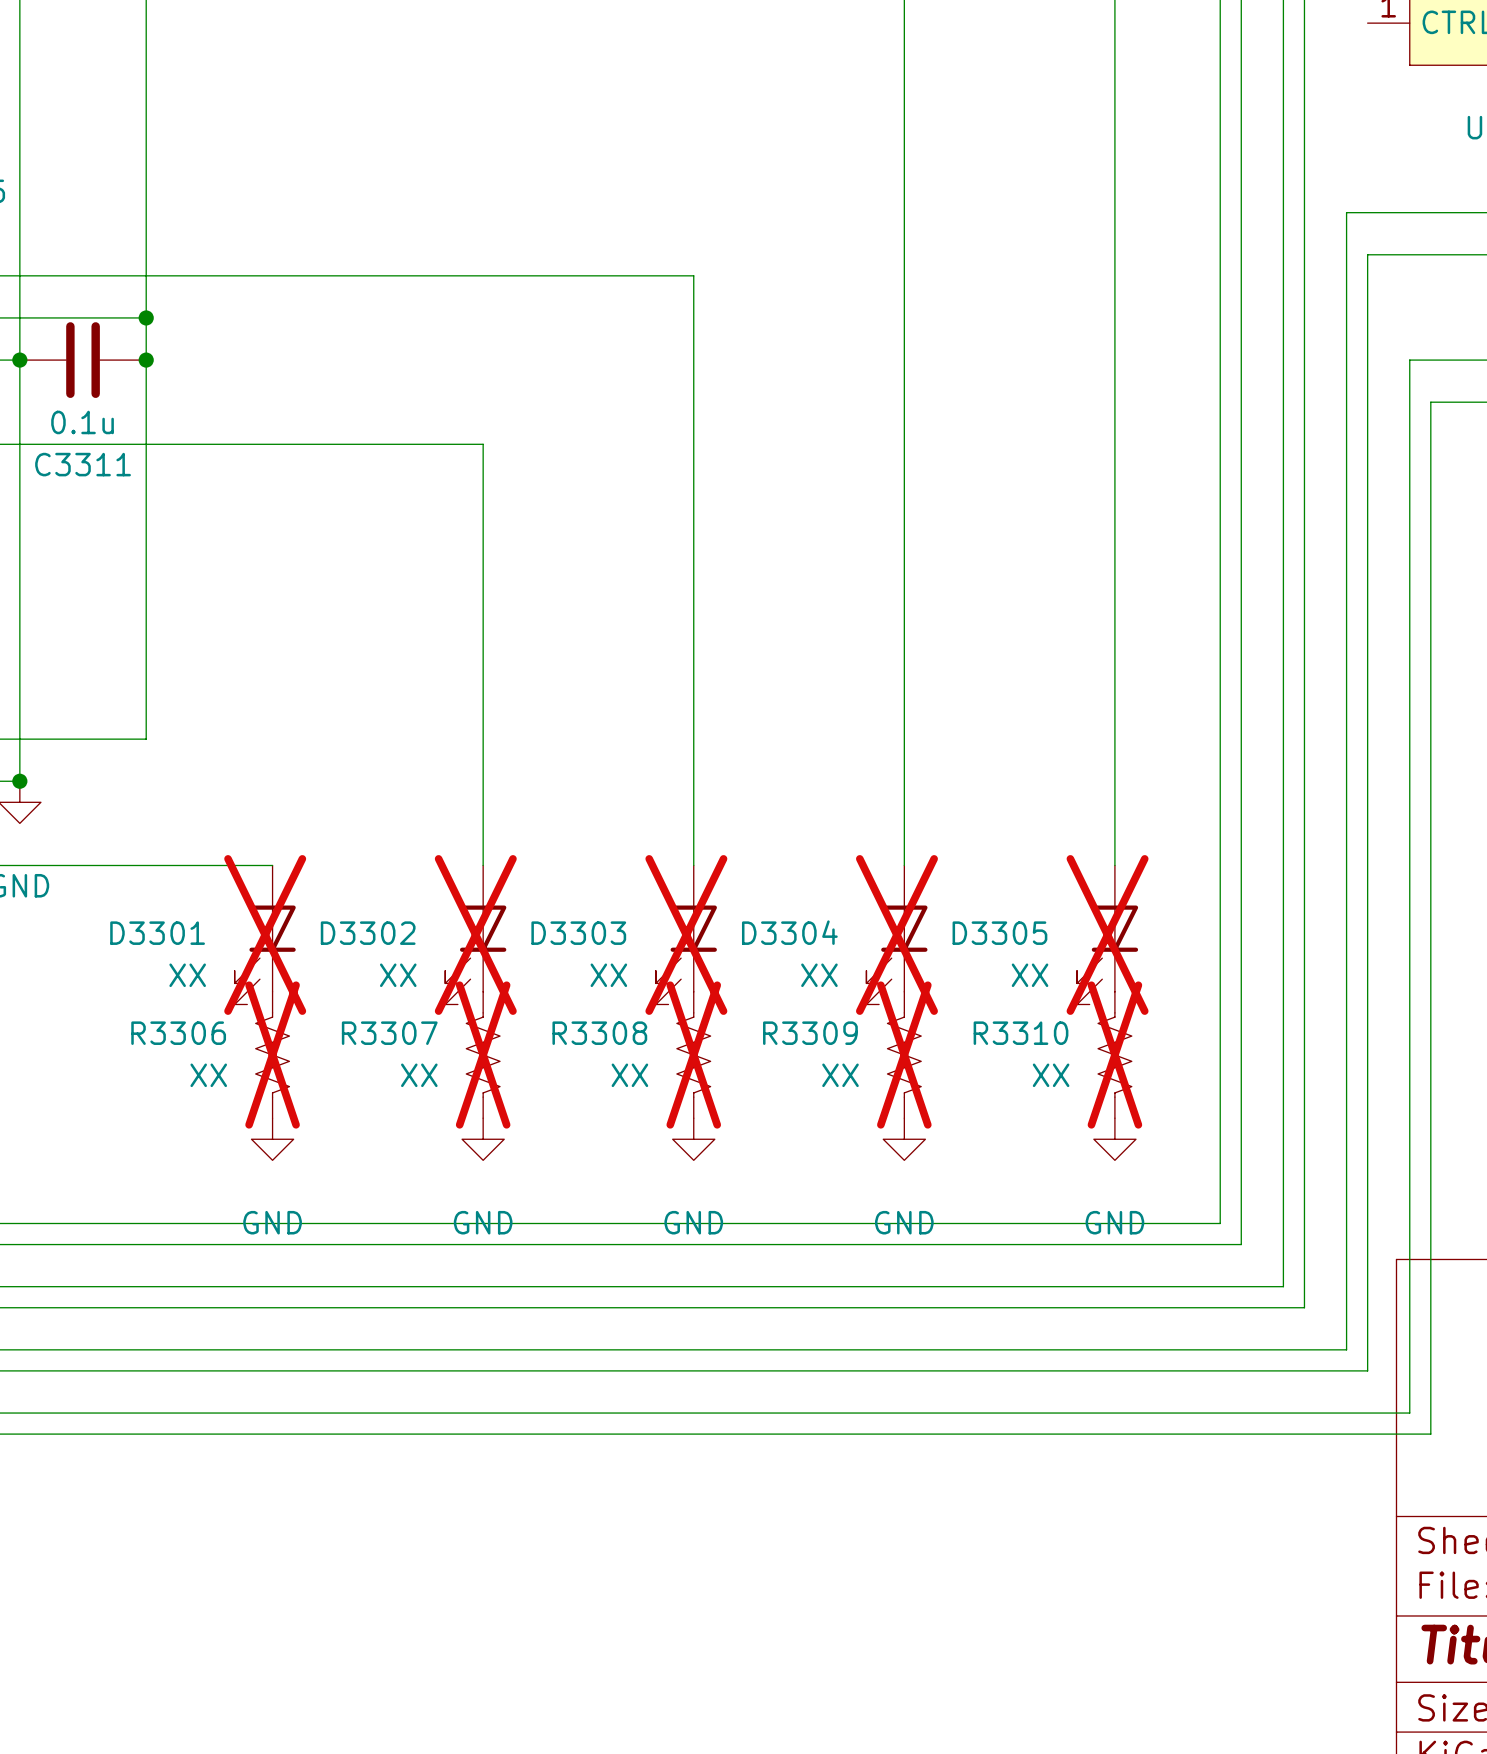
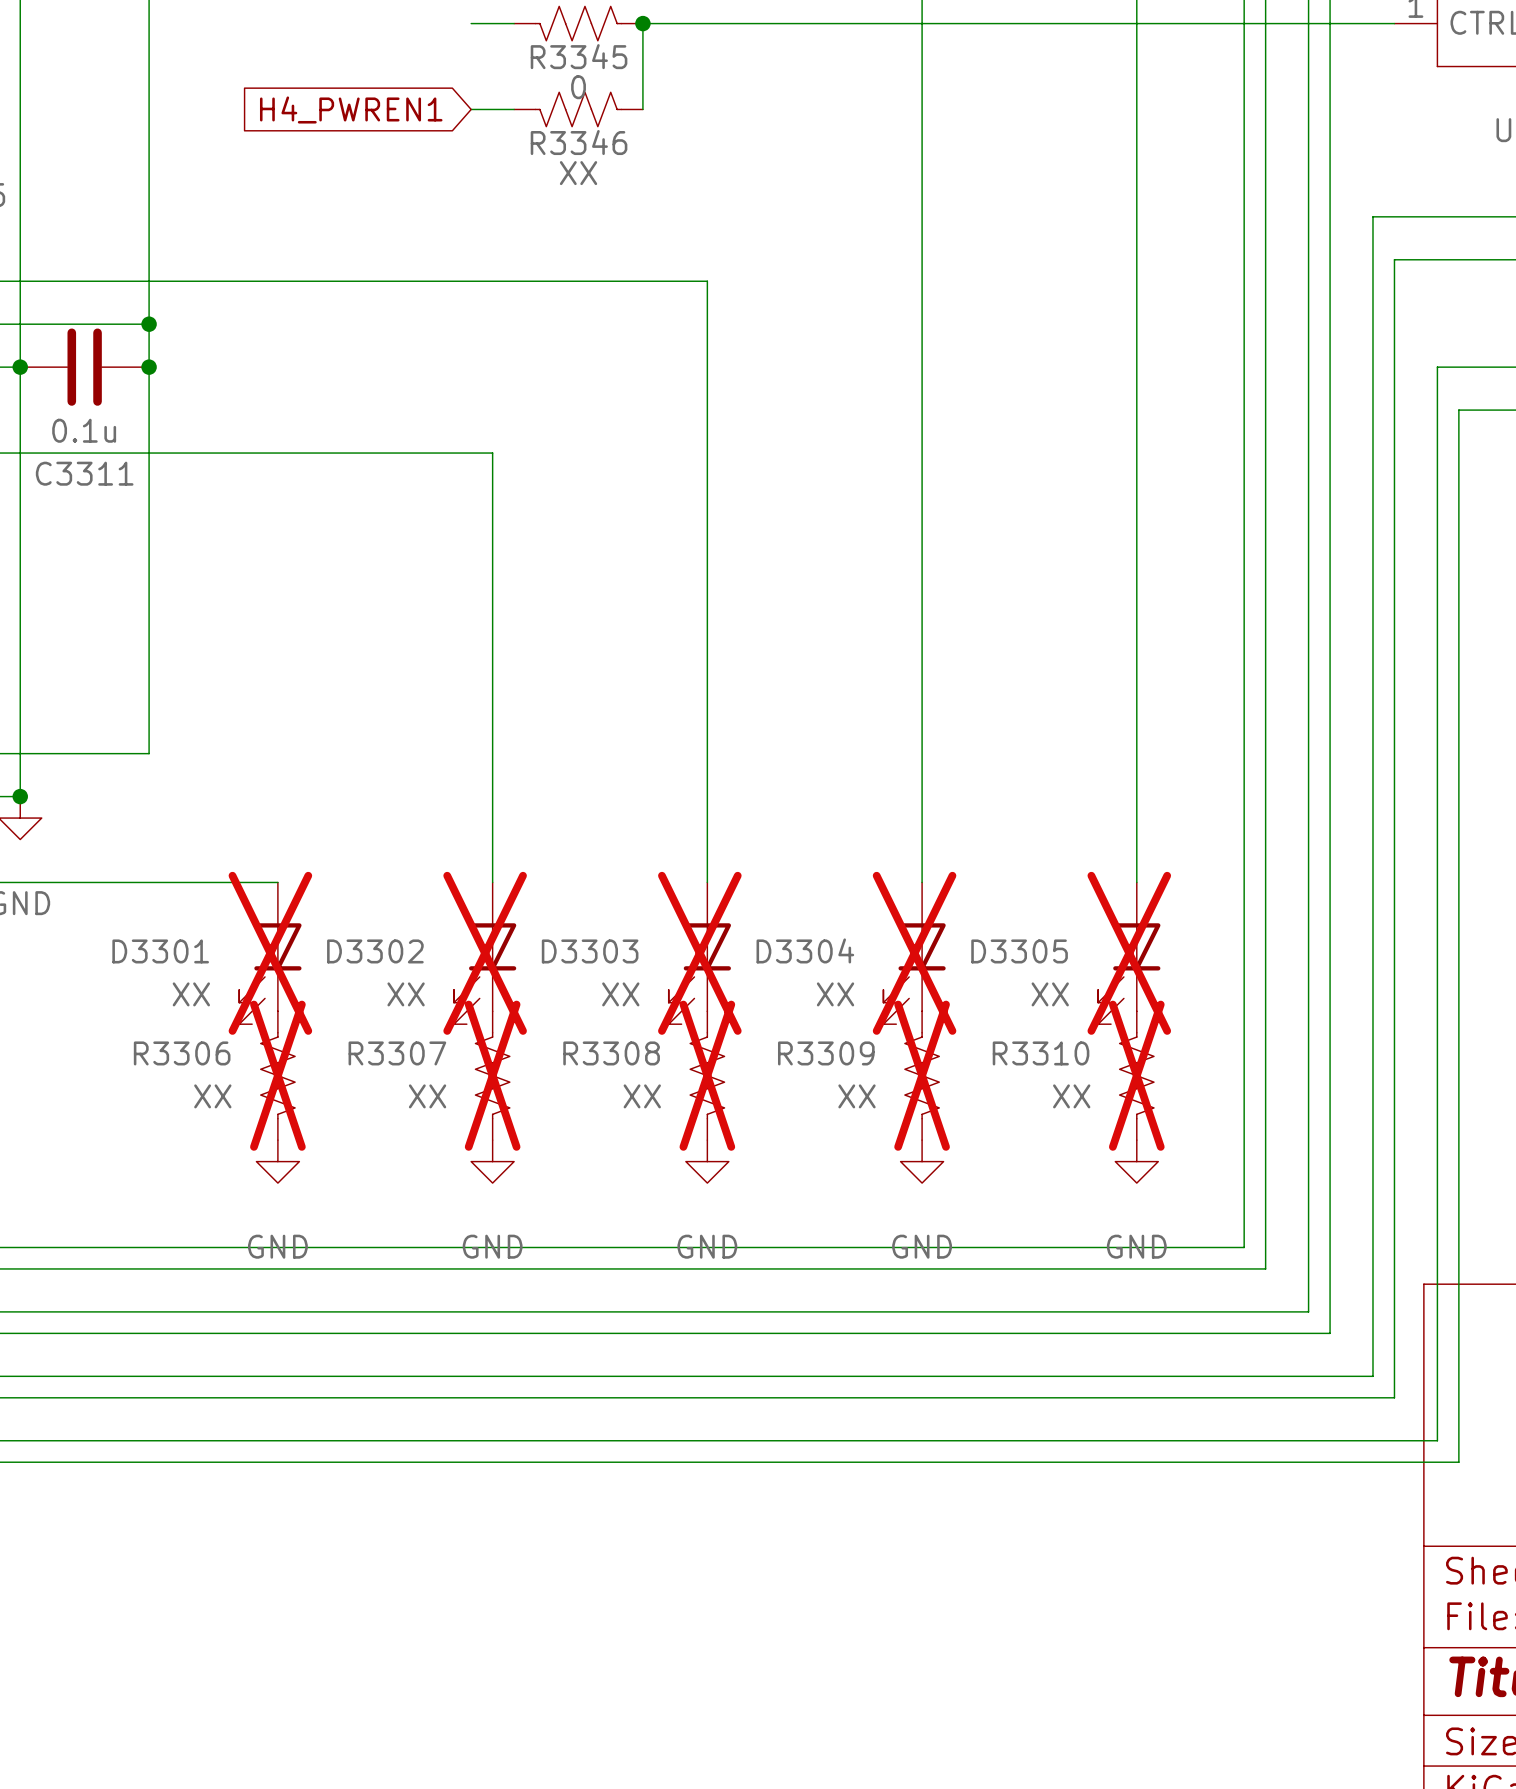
wire: none -> (471, 23) (514, 23)
R3345: none -> 0 (578, 23)
junction: none -> (642, 23)
wire: none -> (1394, 23) (642, 23) (642, 109)
global label: none -> H4_PWREN1 (351, 109)
wire: none -> (471, 109) (514, 109)
R3346: none -> XX (578, 109)

